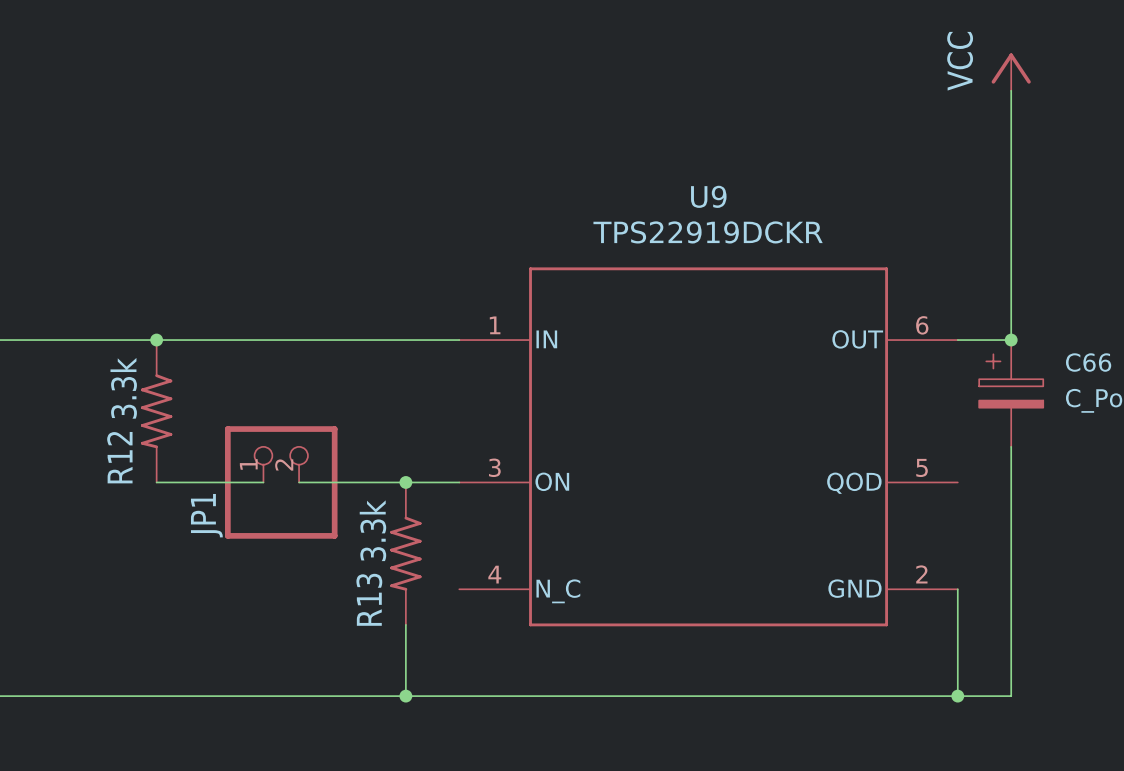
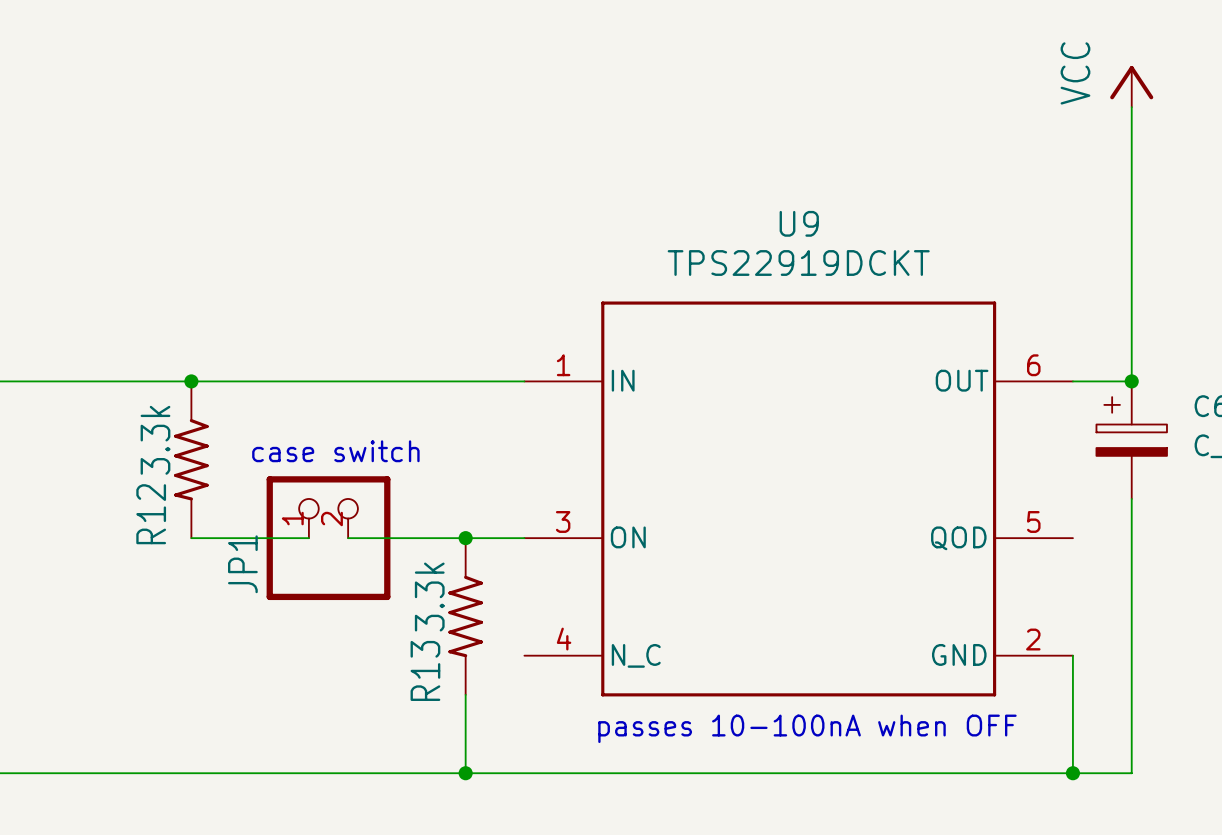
U9 value: TPS22919DCKR (708, 232) -> TPS22919DCKT (798, 263)
text: none -> case switch (335, 451)
text: none -> passes 10-100nA when OFF (807, 728)

